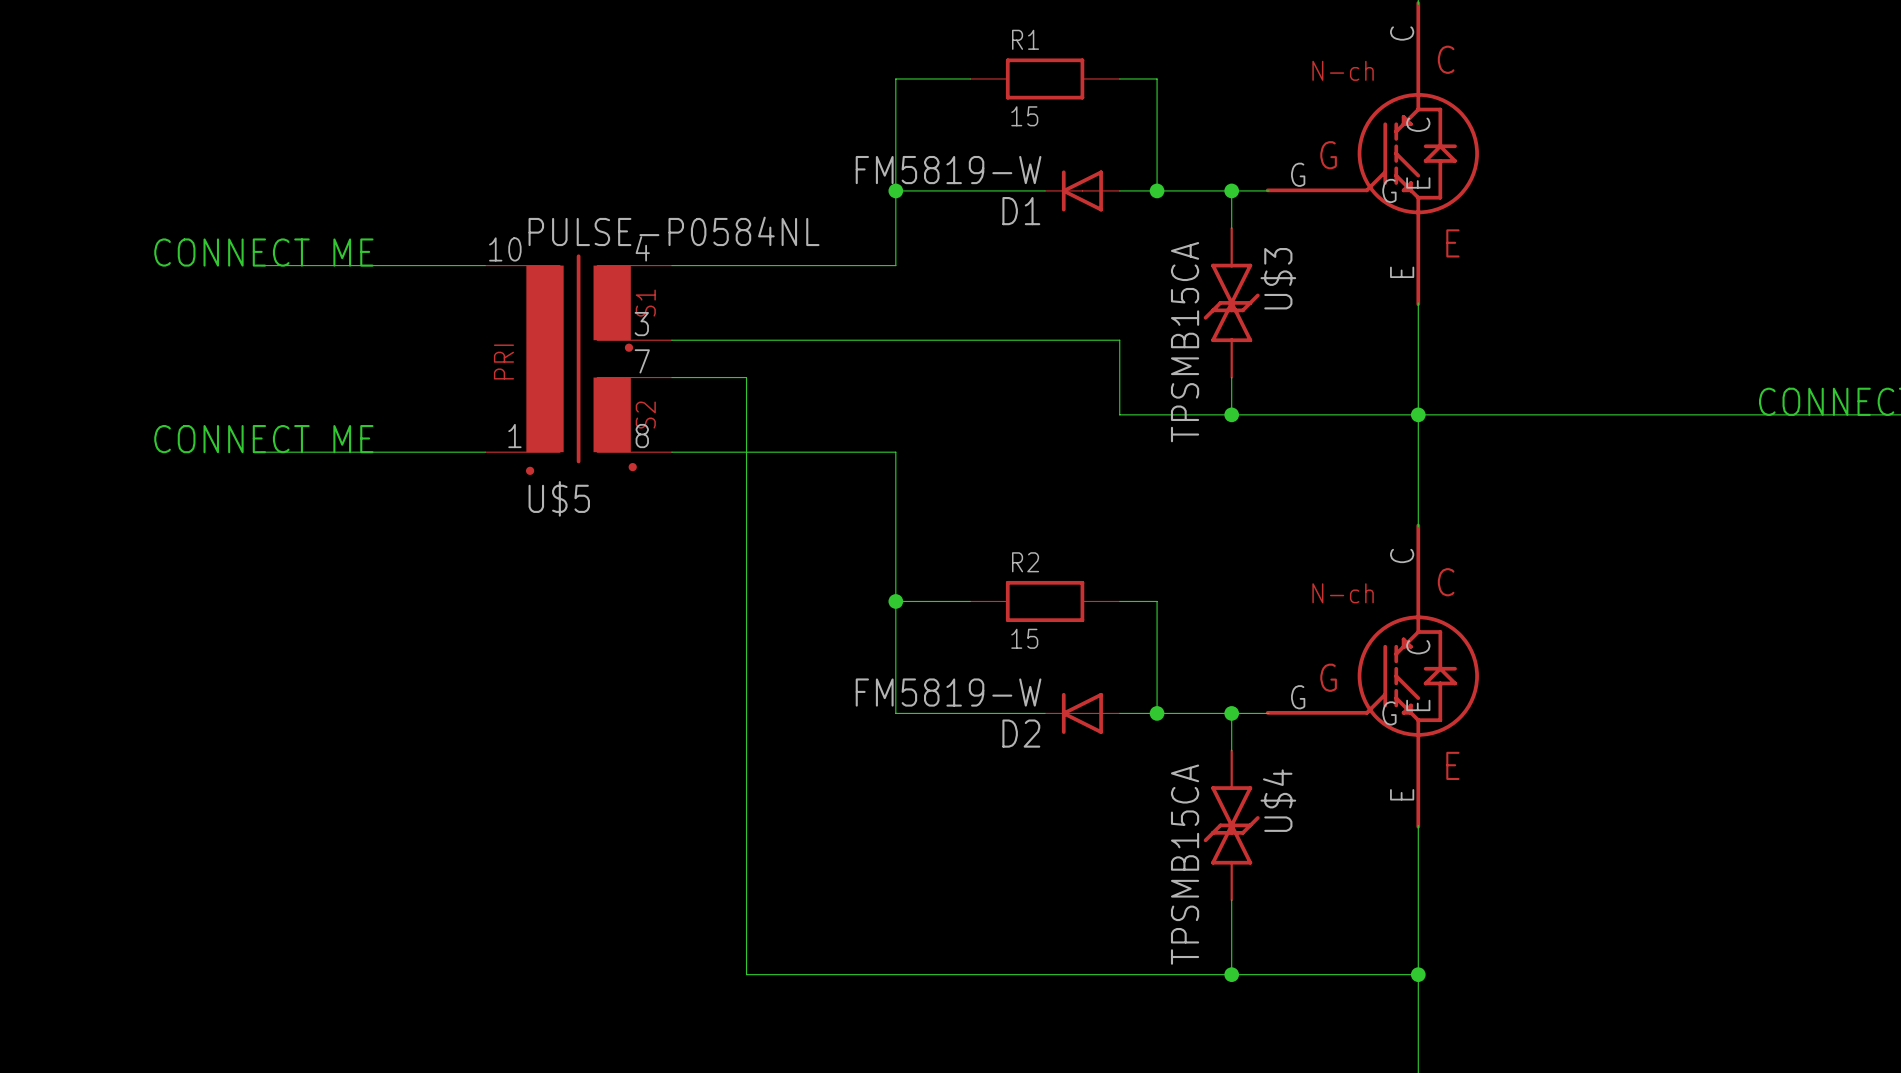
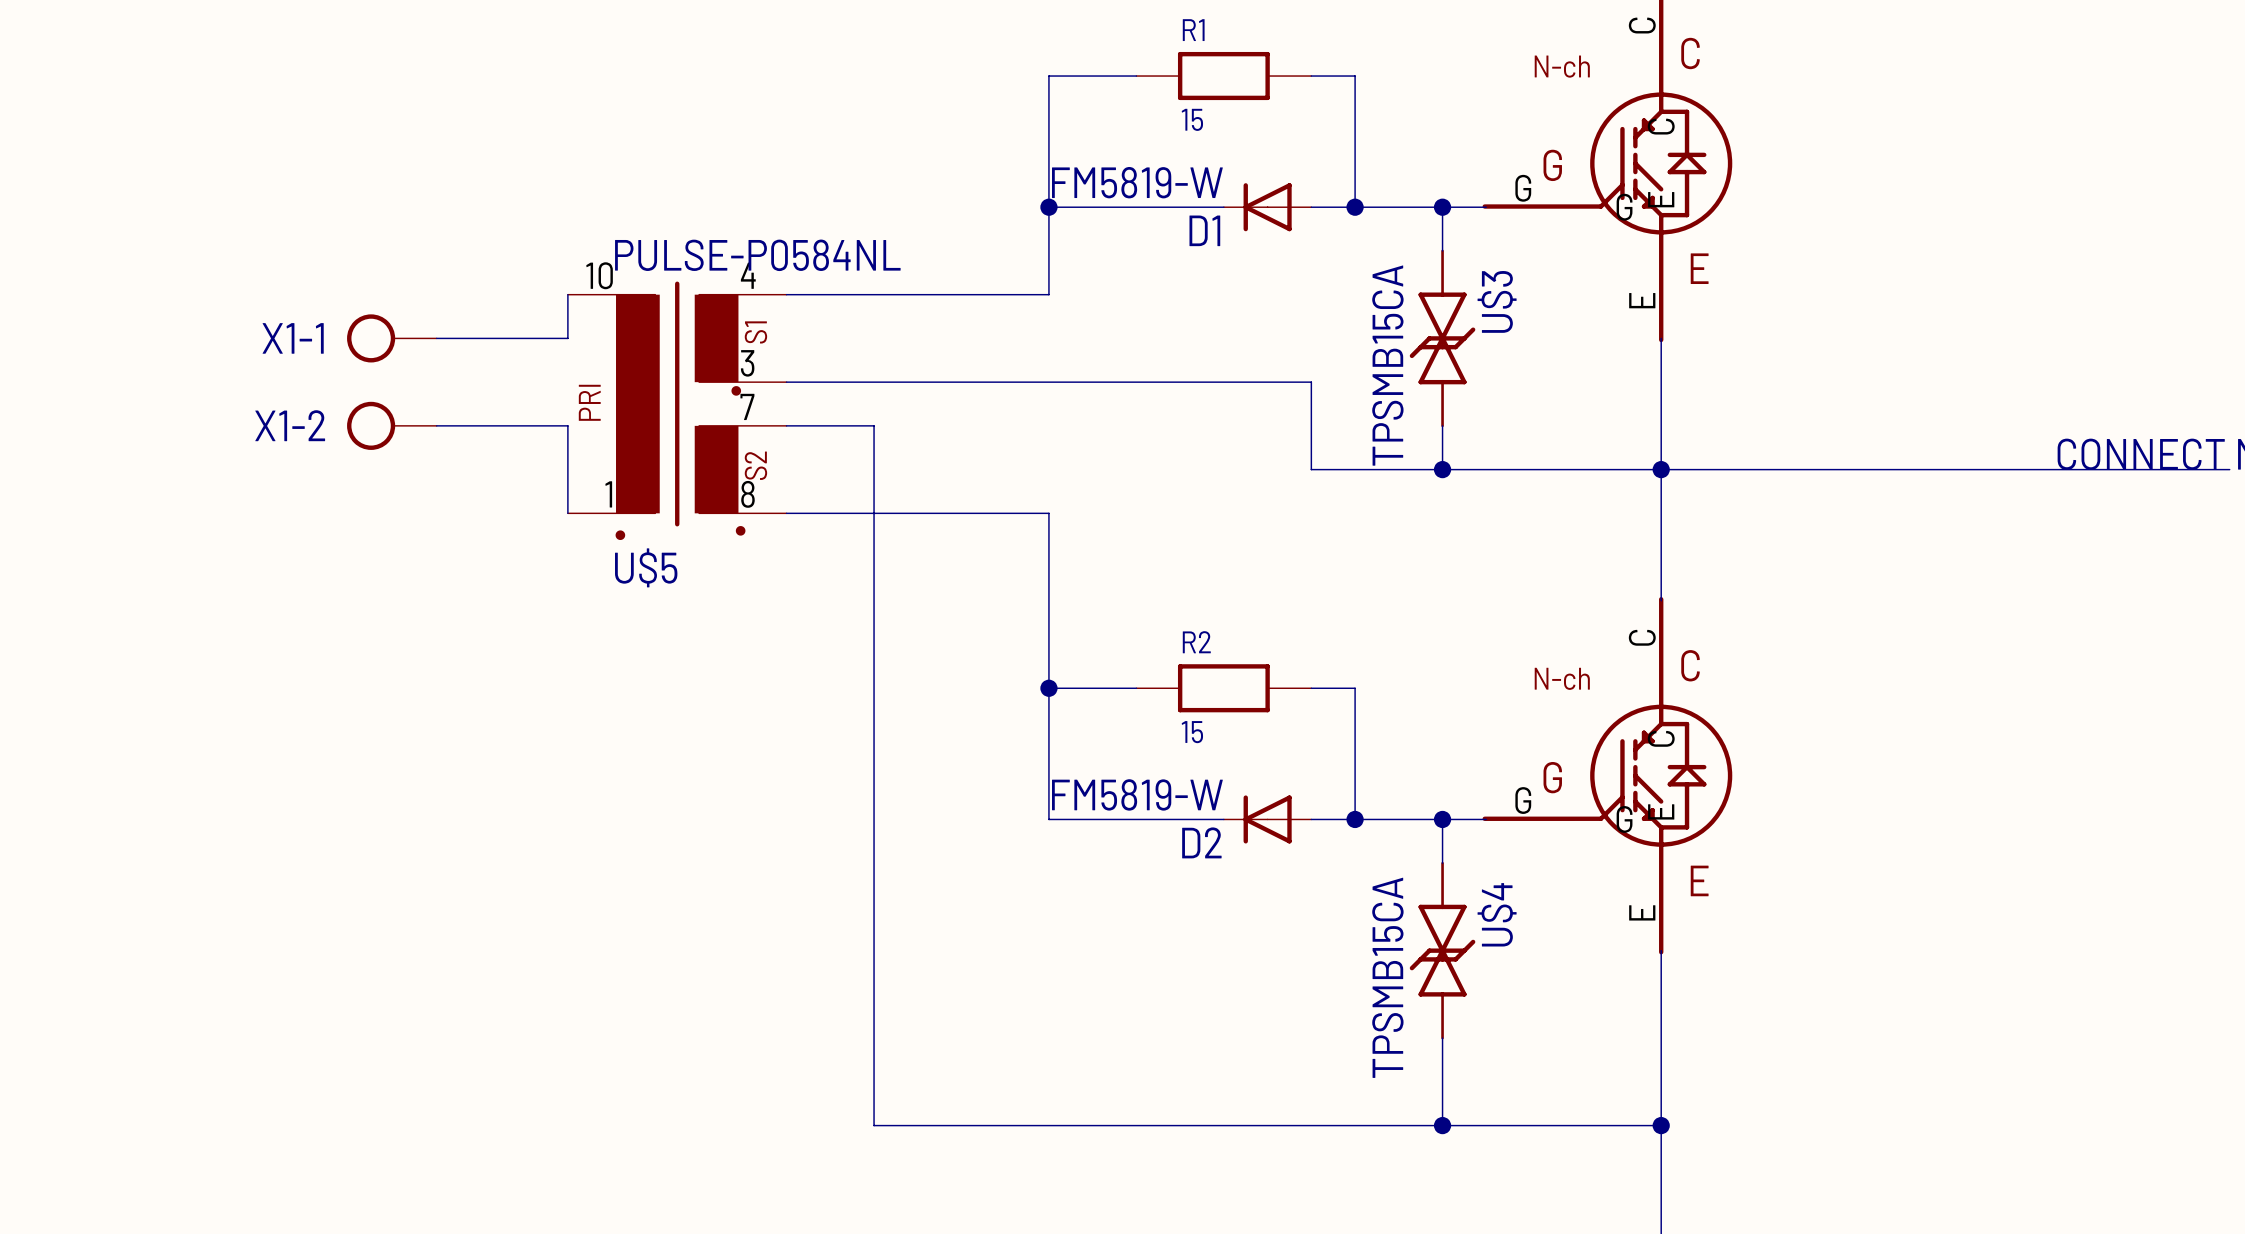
text: CONNECT ME (263, 252) -> none
wire: (261, 265) (485, 265) -> (436, 338) (567, 338) (567, 294)
X1-1: none -> (391, 338)
X1-2: none -> (391, 425)
text: CONNECT ME (263, 439) -> none
wire: (261, 452) (485, 452) -> (436, 425) (567, 425) (567, 513)

